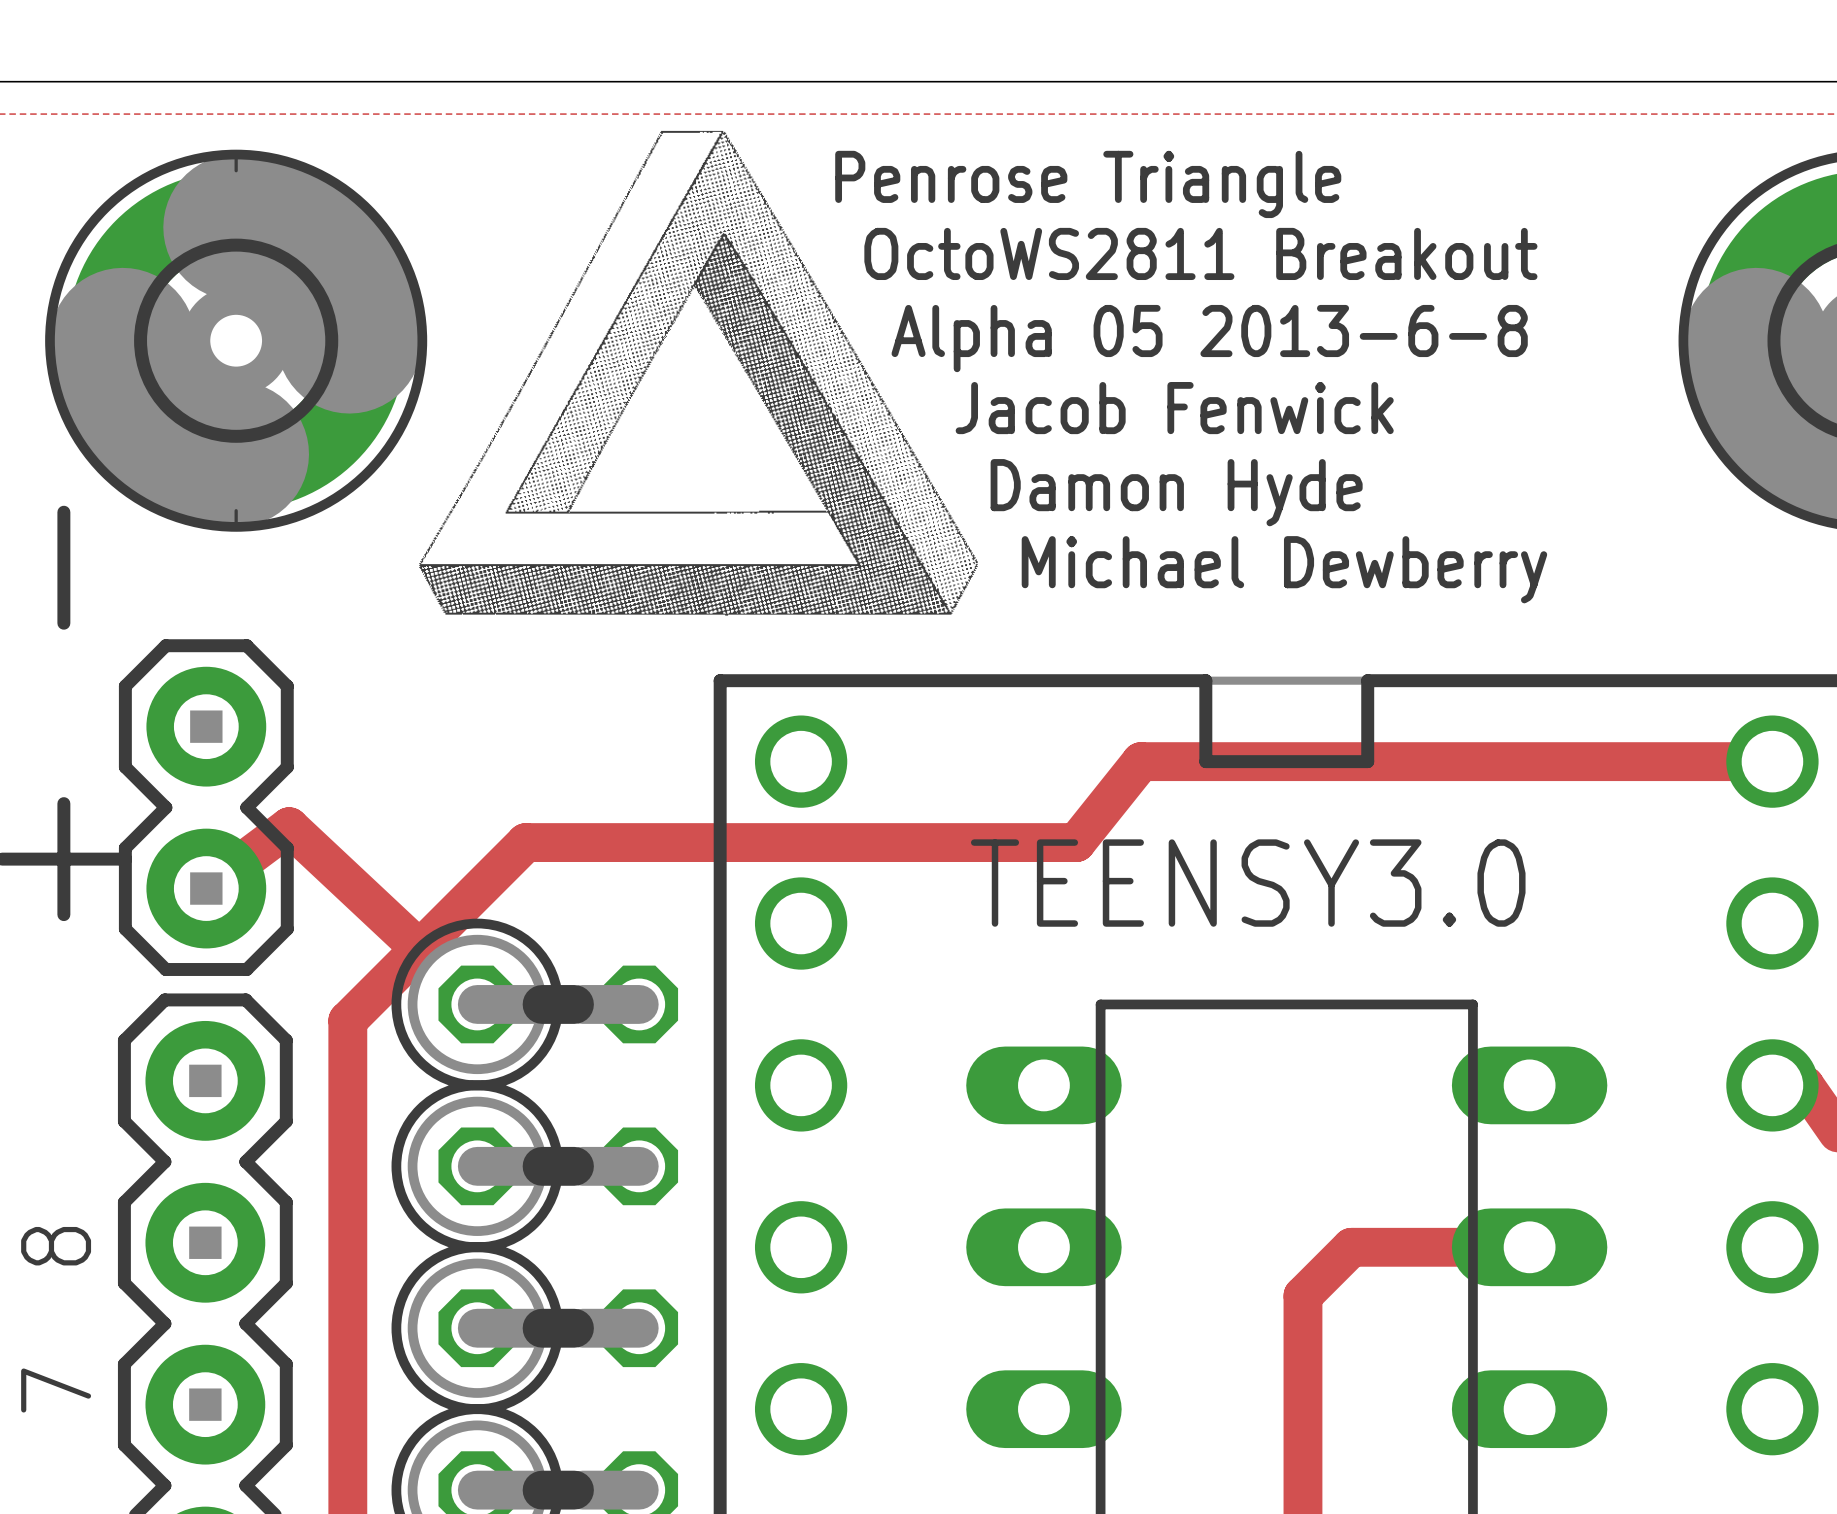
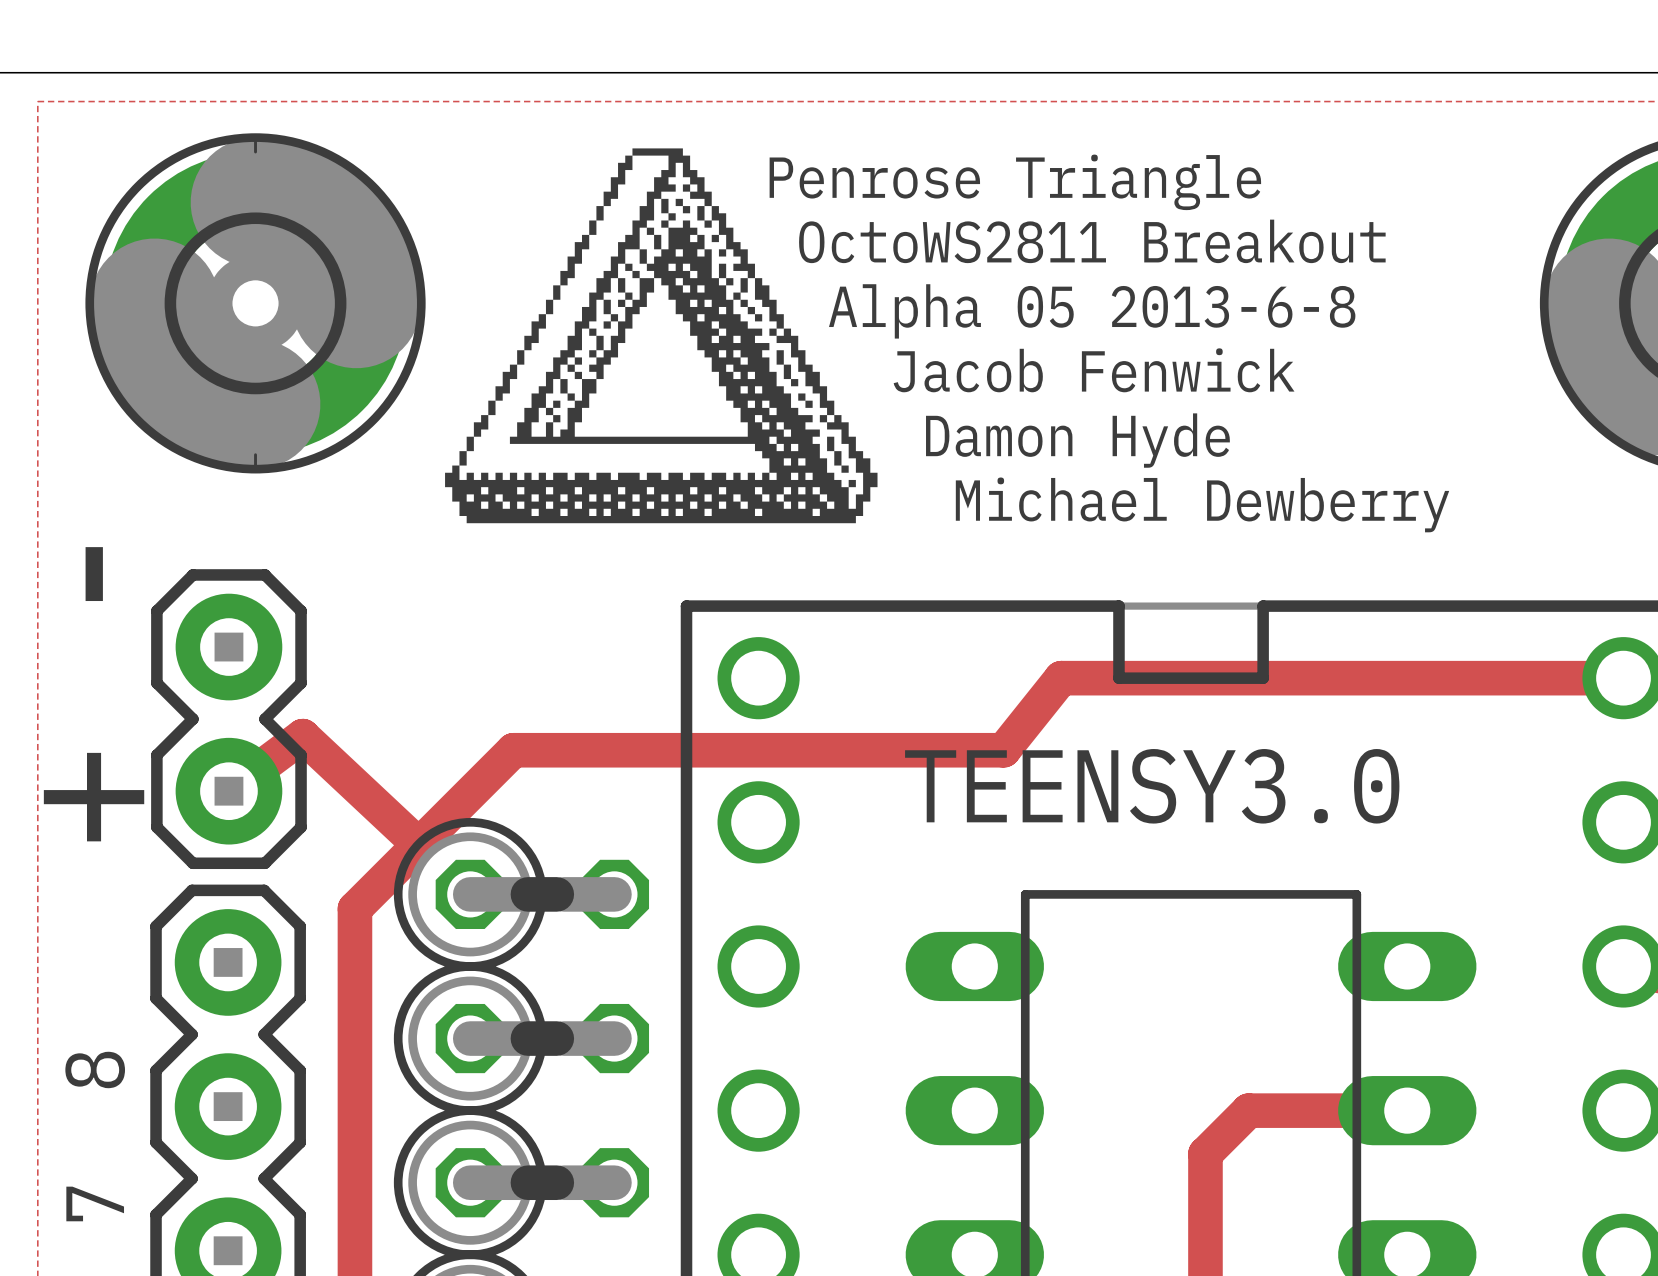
drawing shape: [419, 130, 978, 616] -> [445, 148, 878, 524]
text position: Penrose Triangle (1088, 184) -> Penrose Triangle (1015, 182)
text position: OctoWS2811 Breakout (1200, 253) -> OctoWS2811 Breakout (1092, 241)
text position: Alpha 05 2013-6-8 (1209, 338) -> Alpha 05 2013-6-8 (1092, 311)
text position: Jacob Fenwick (1174, 408) -> Jacob Fenwick (1094, 370)
text position: Damon Hyde (1176, 492) -> Damon Hyde (1077, 440)
text position: Michael Dewberry (1284, 569) -> Michael Dewberry (1202, 504)

